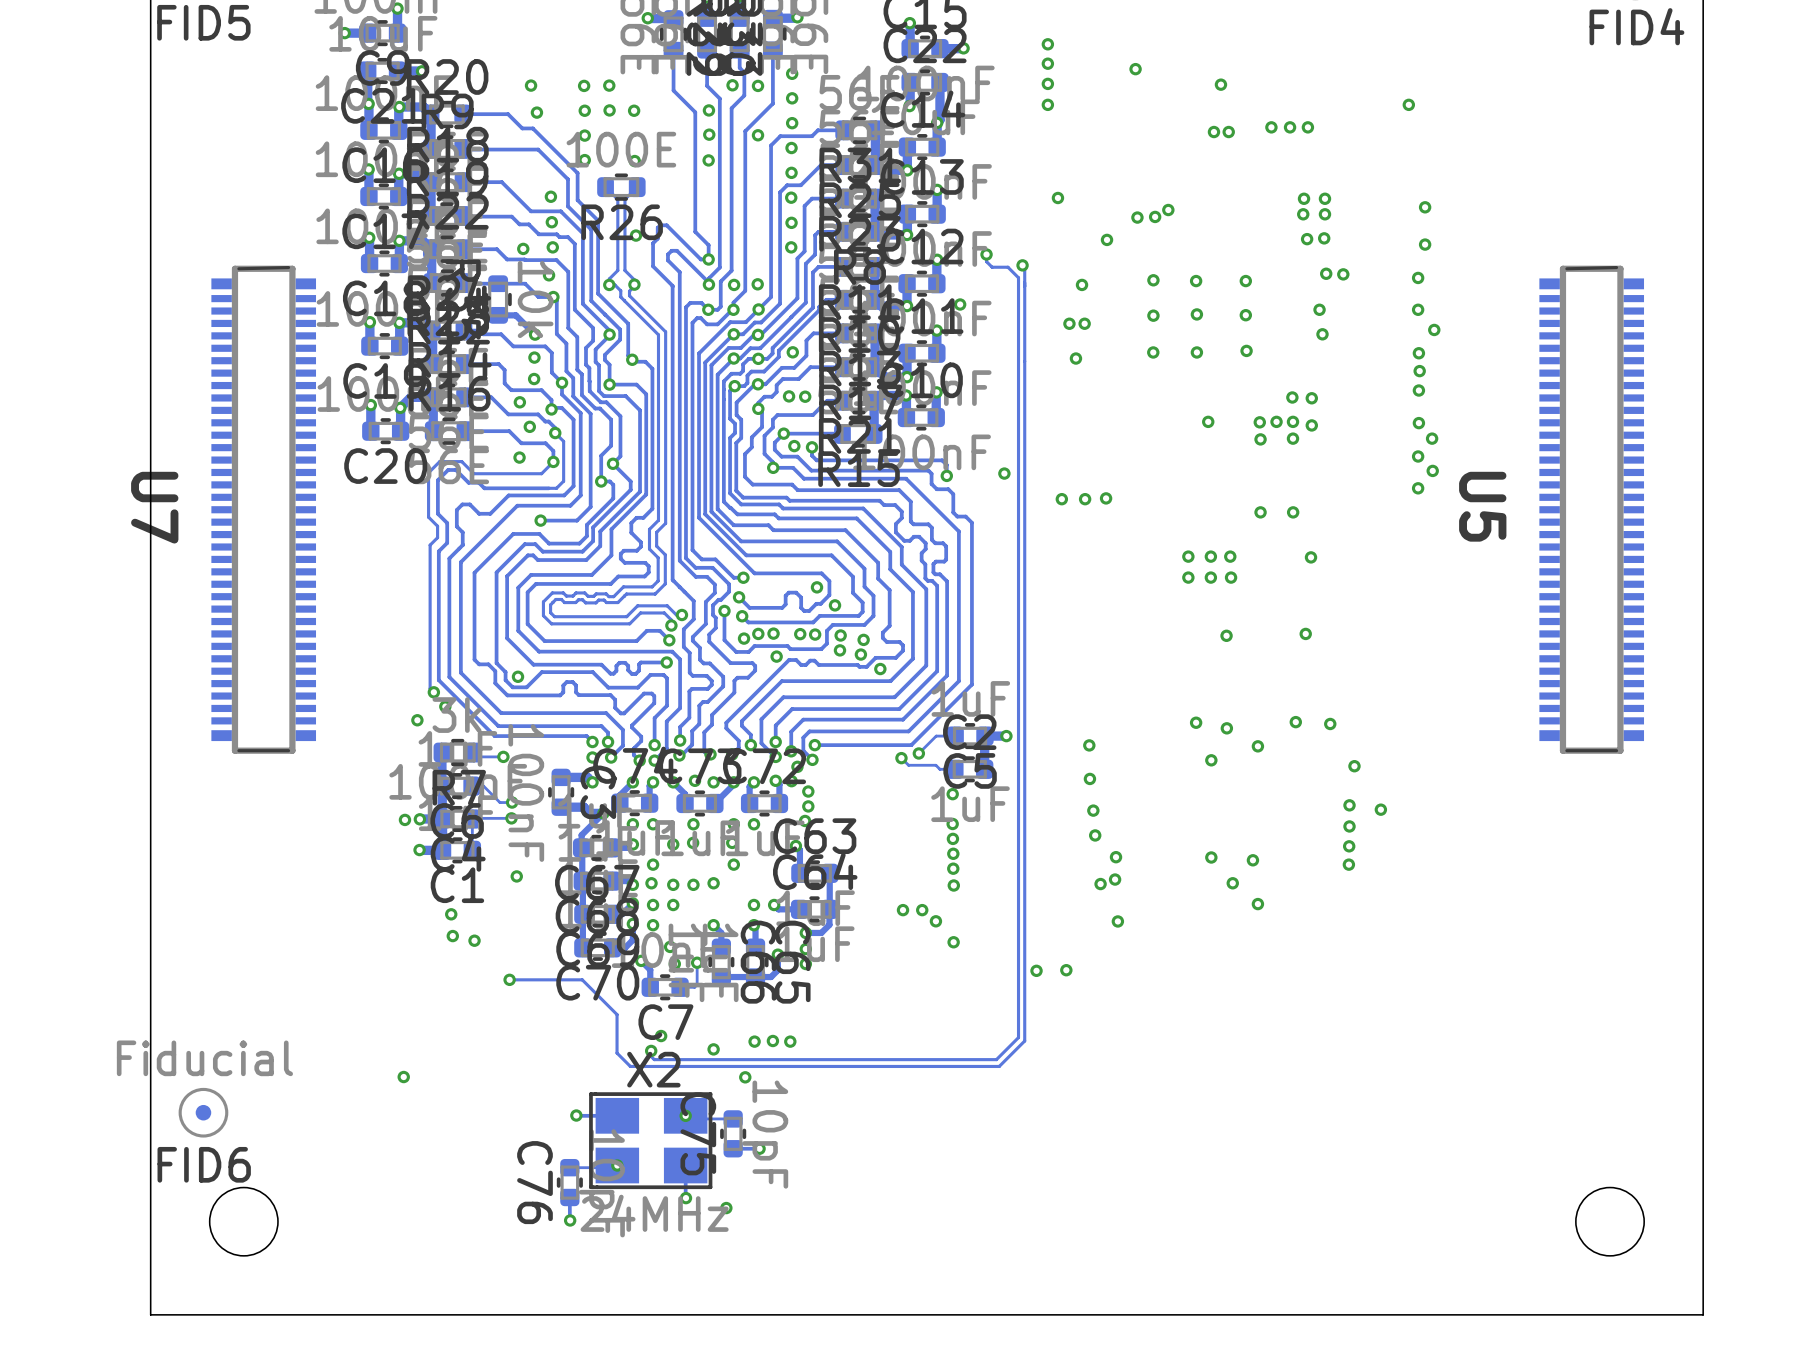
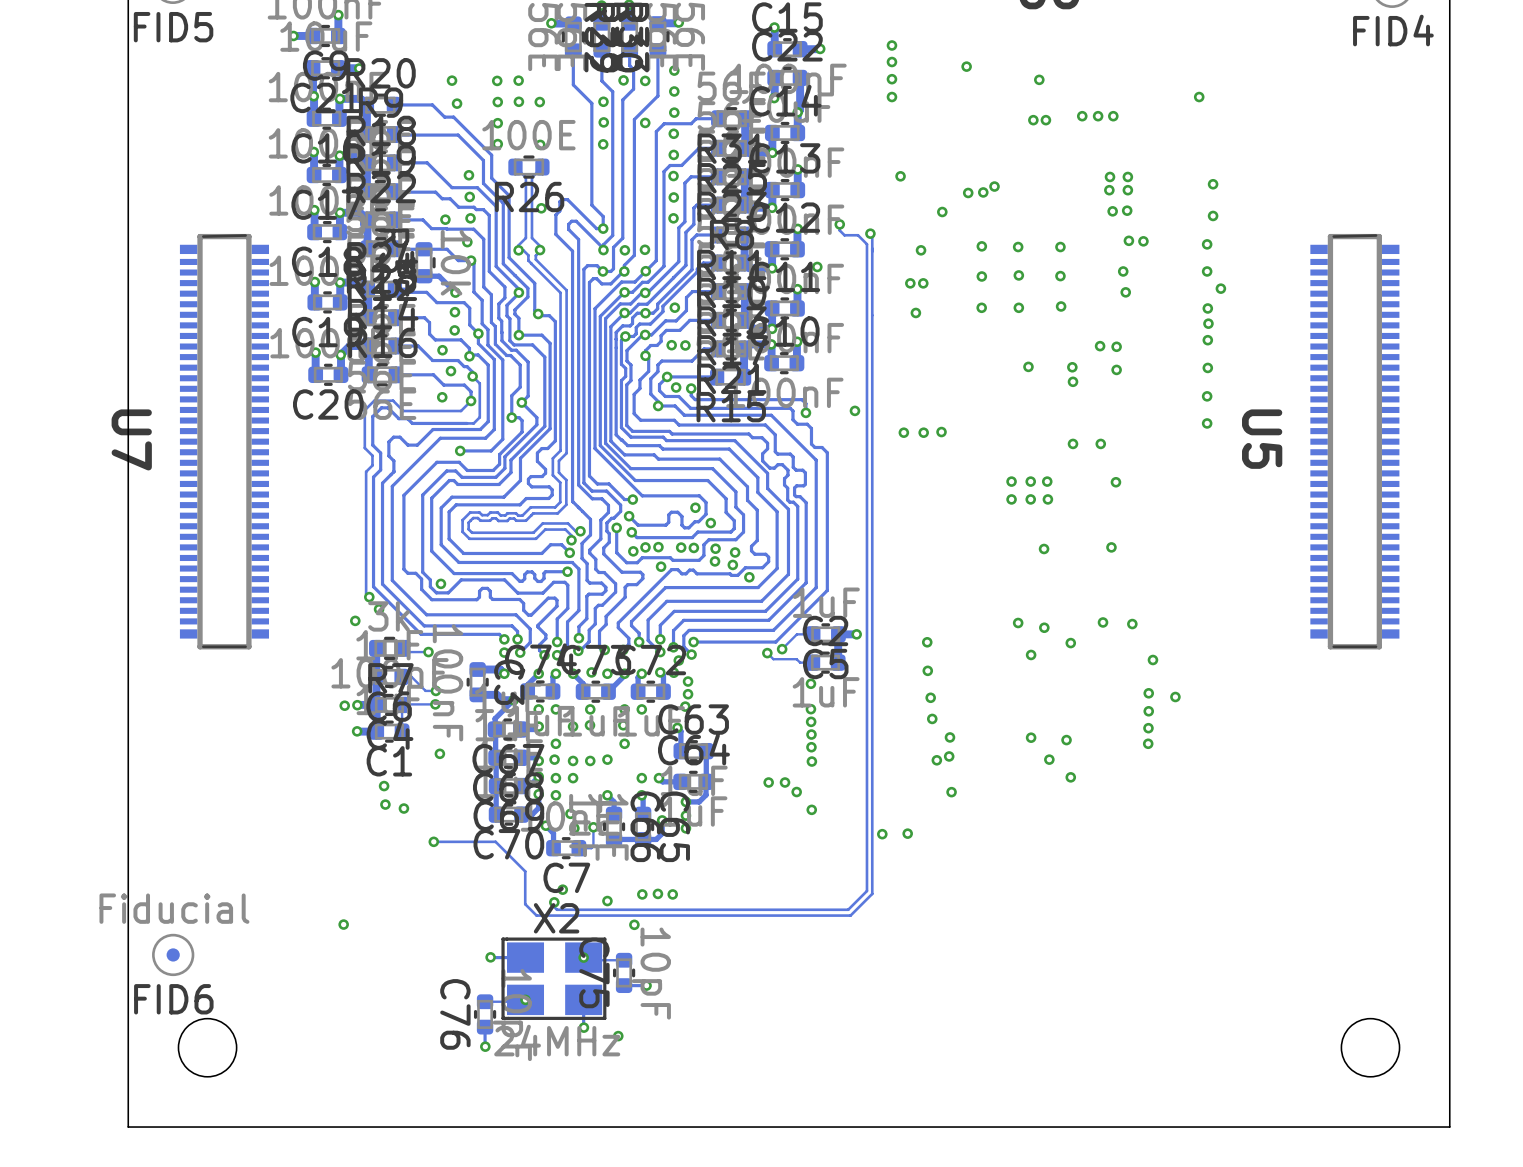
via: (1276, 421) -> none
via: (1292, 421) -> none
via: (1292, 438) -> none
via: (1432, 438) -> none
via: (1432, 470) -> none

